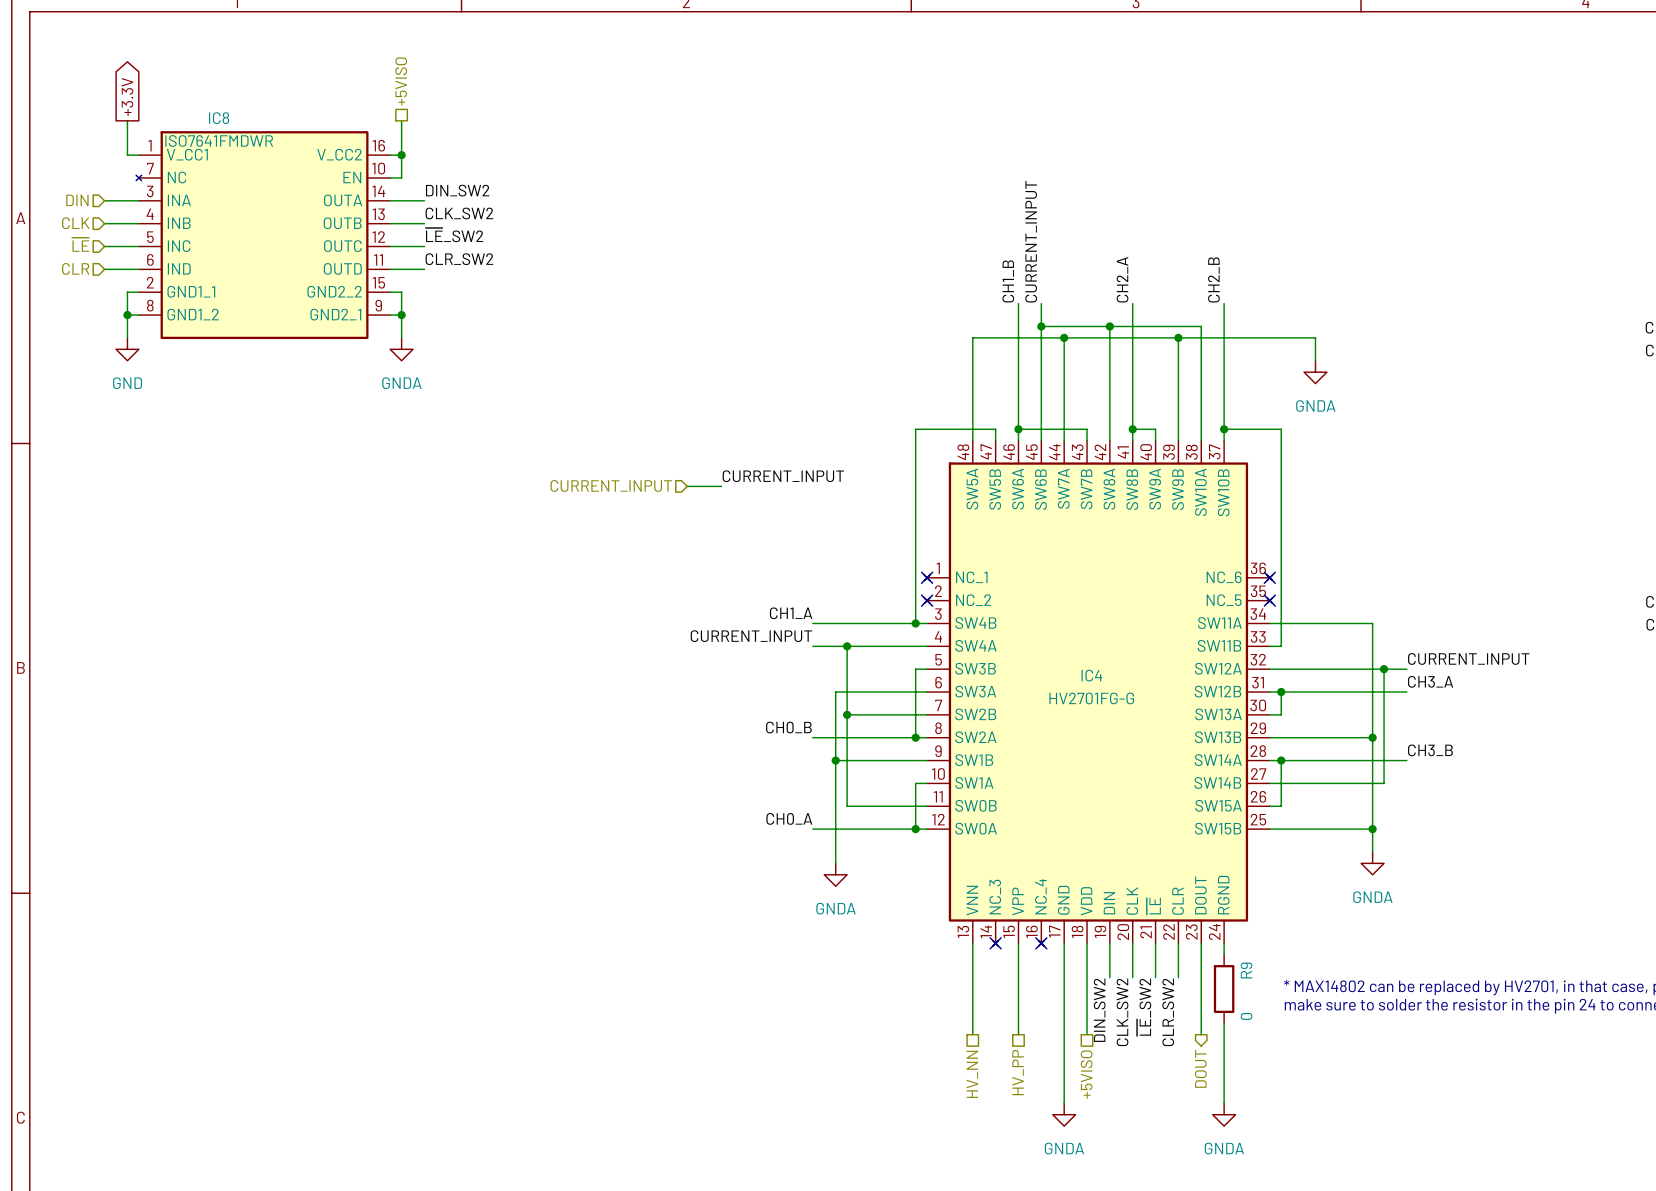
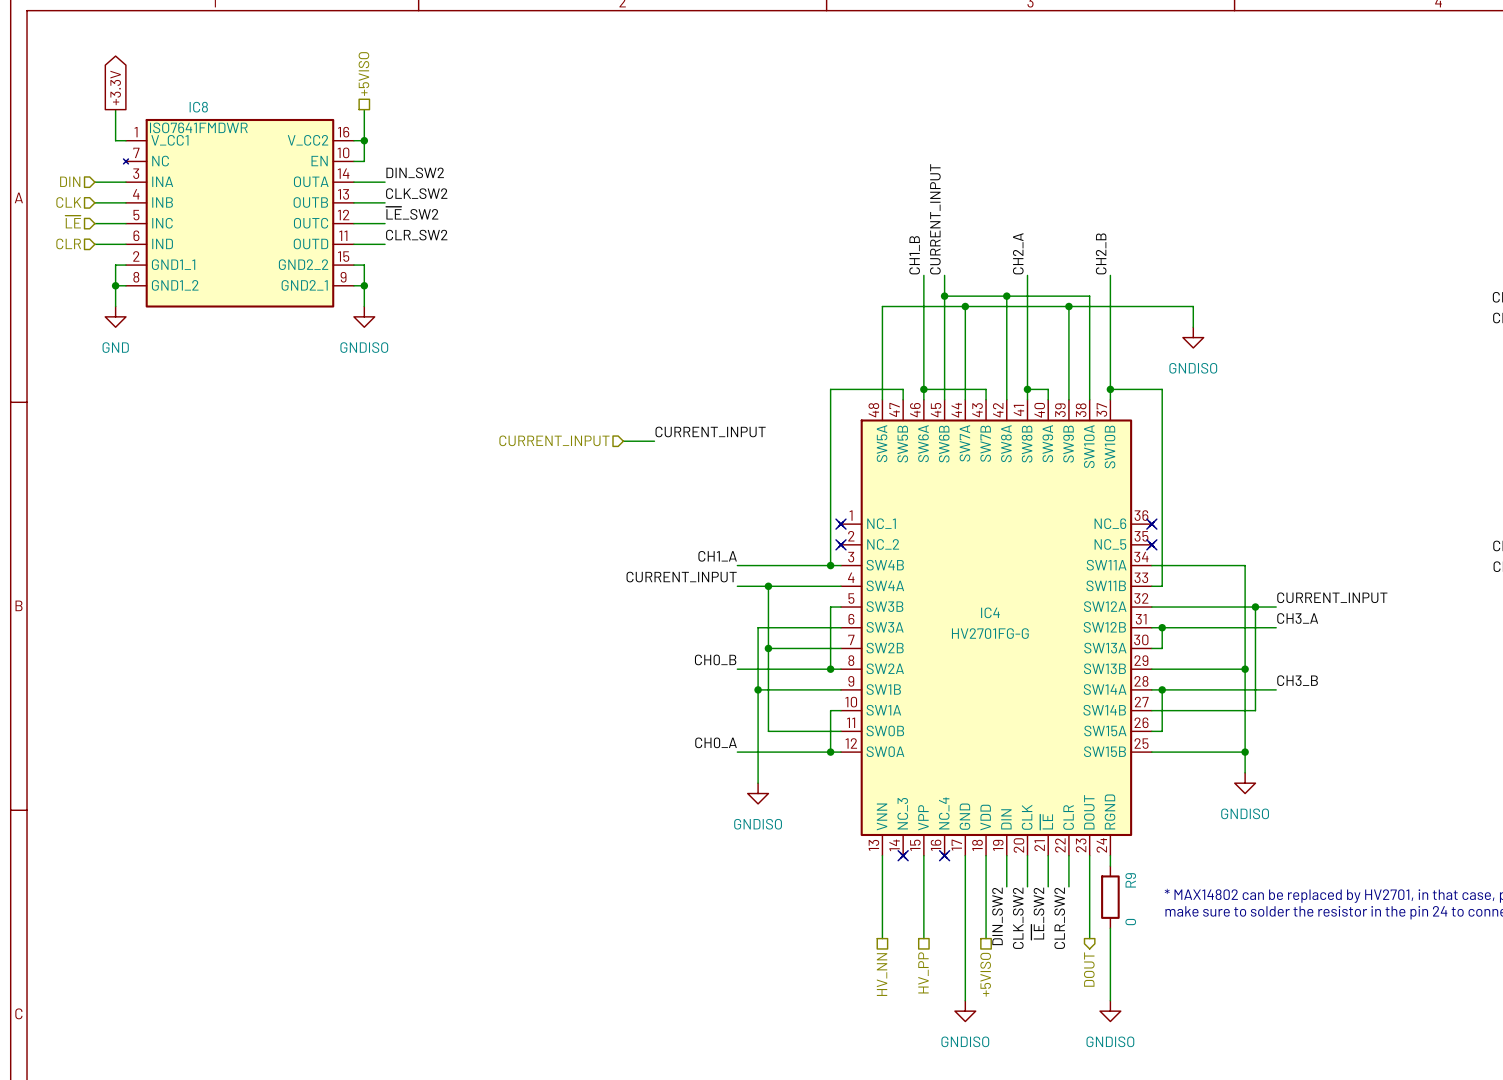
power symbol: GNDA (401, 349) -> GNDISO (364, 316)
power symbol: GNDA (1315, 372) -> GNDISO (1193, 337)
power symbol: GNDA (1372, 863) -> GNDISO (1245, 783)
power symbol: GNDA (835, 874) -> GNDISO (758, 793)
power symbol: GNDA (1064, 1114) -> GNDISO (965, 1011)
power symbol: GNDA (1224, 1114) -> GNDISO (1110, 1011)

